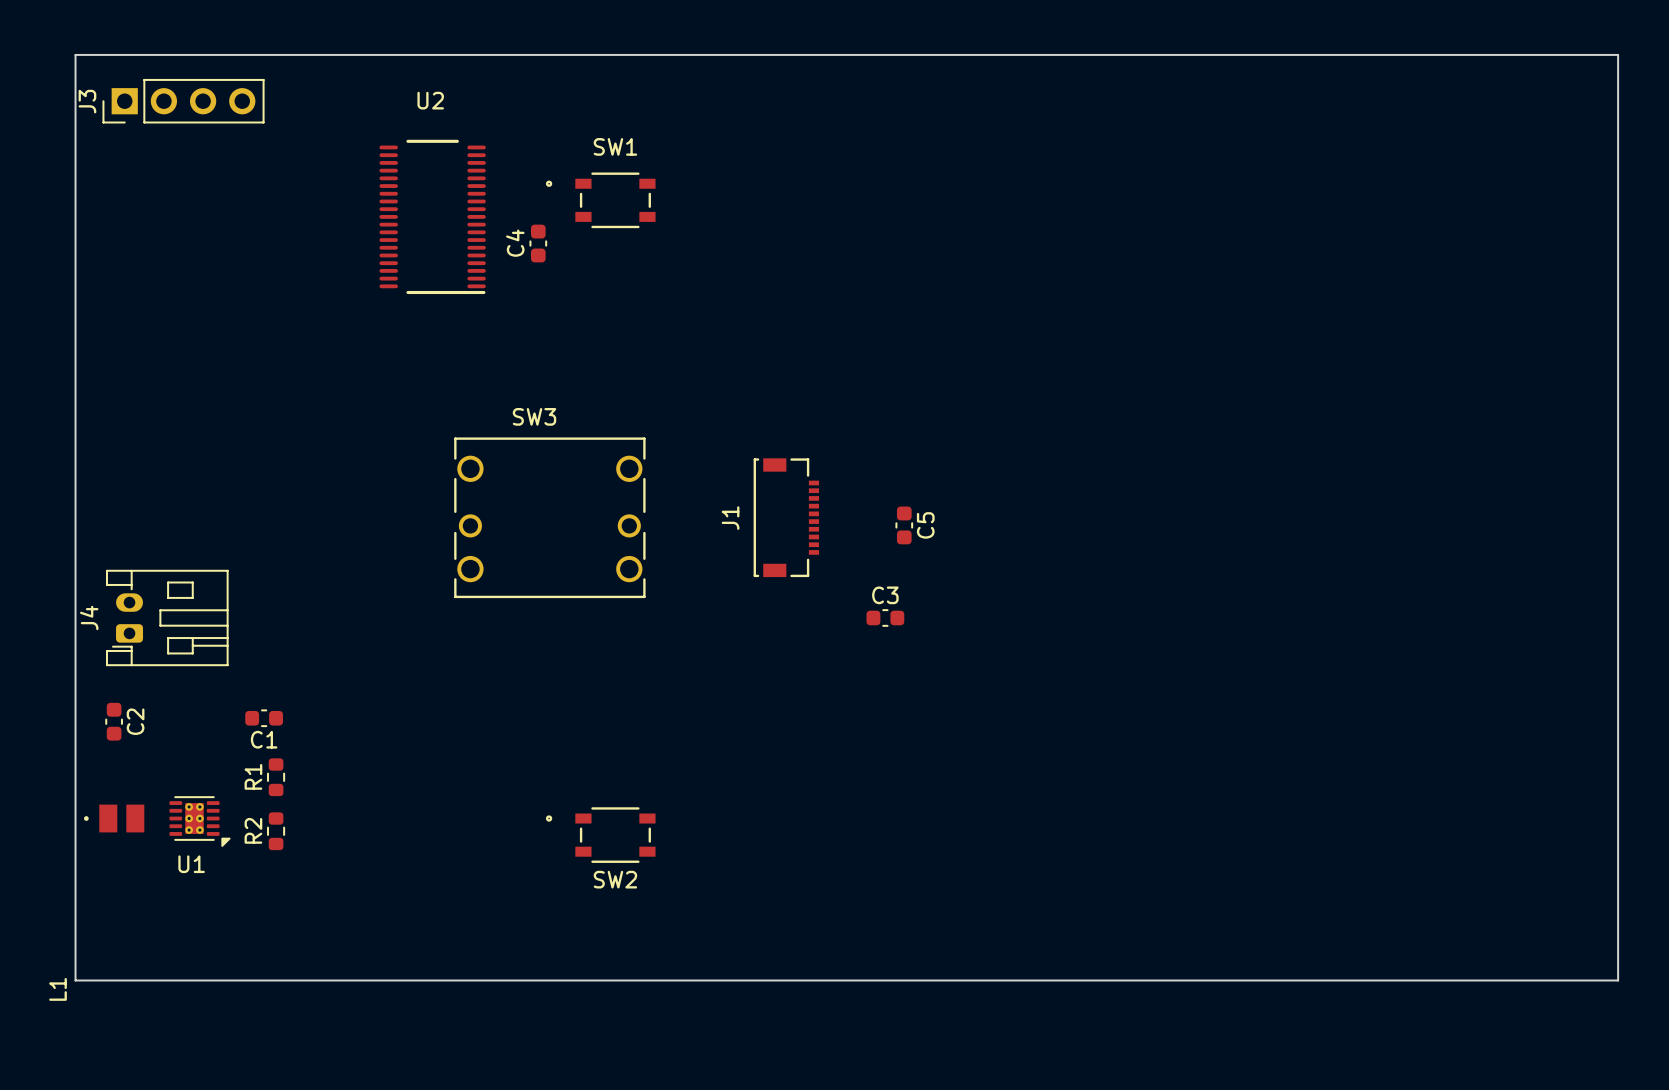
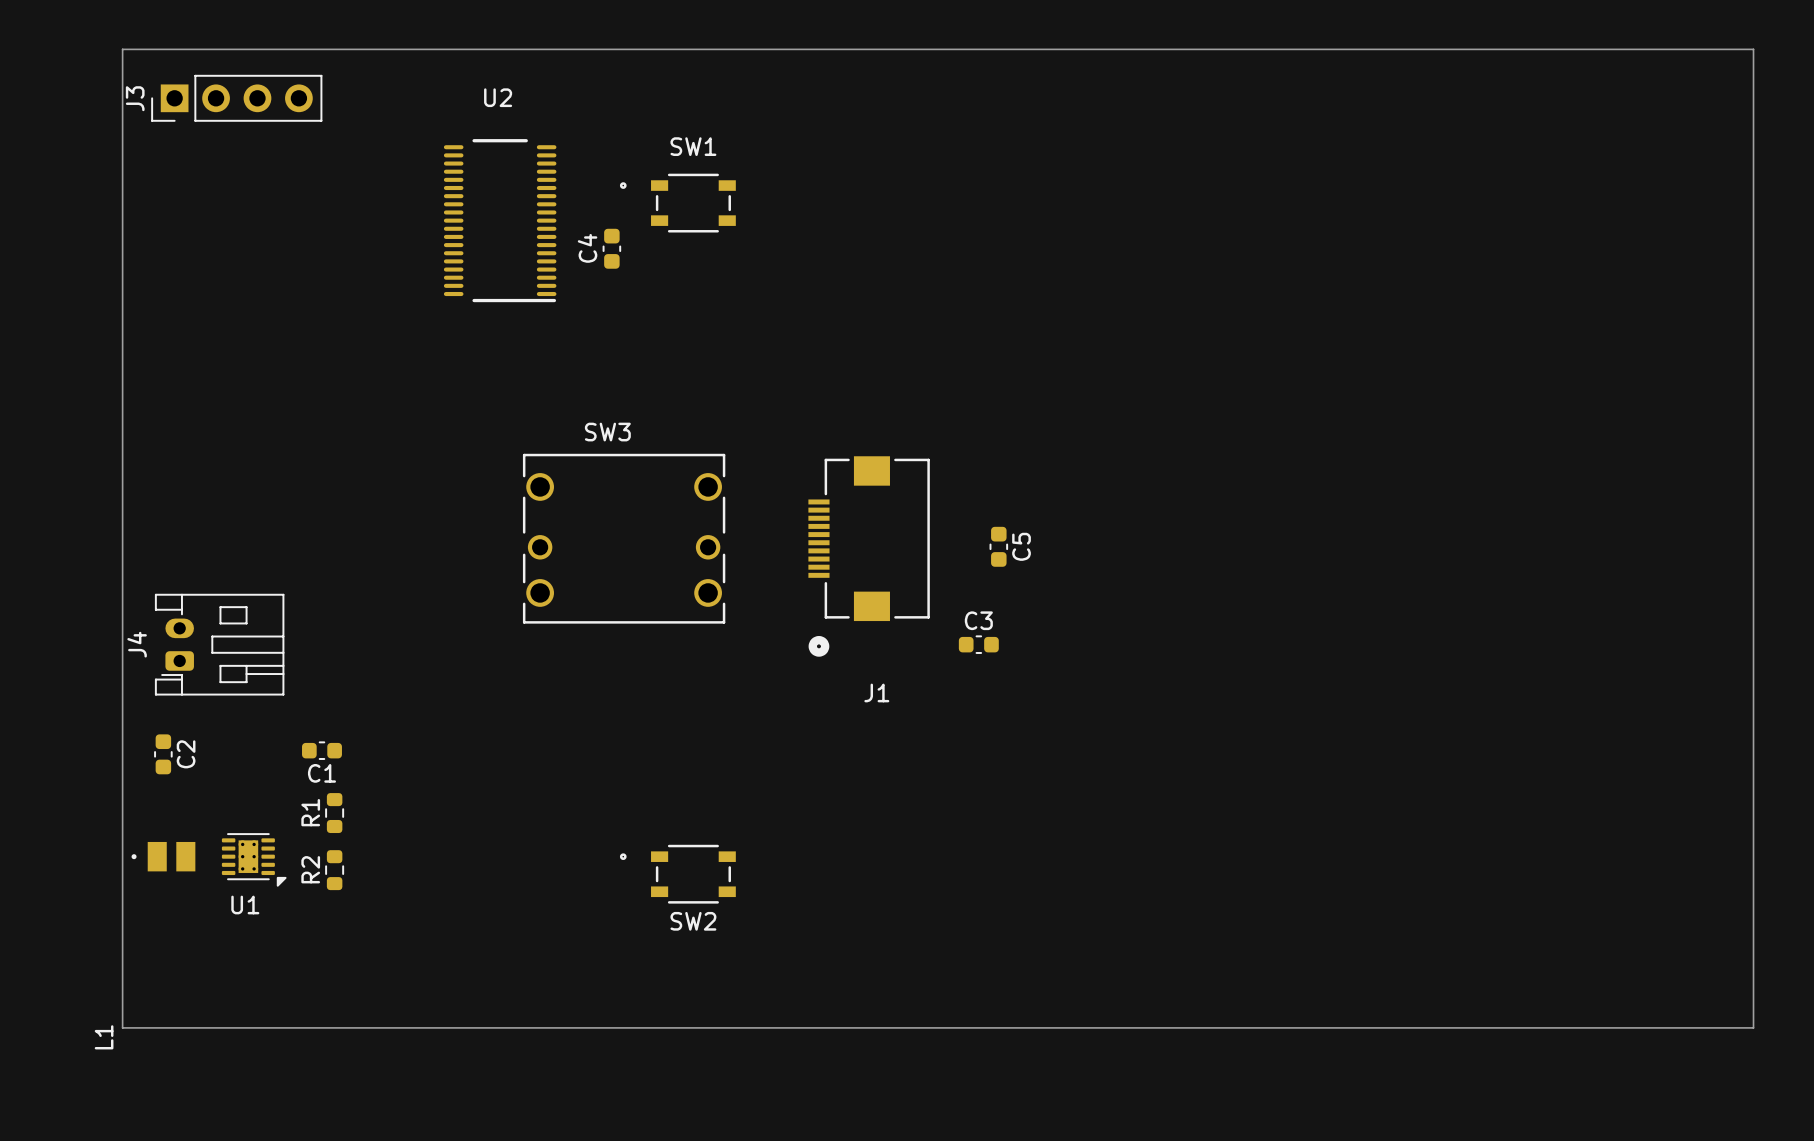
J1 footprint: [753, 458, 820, 578] -> [808, 456, 930, 657]
J1 name position: J1 (730, 518) -> J1 (876, 692)

